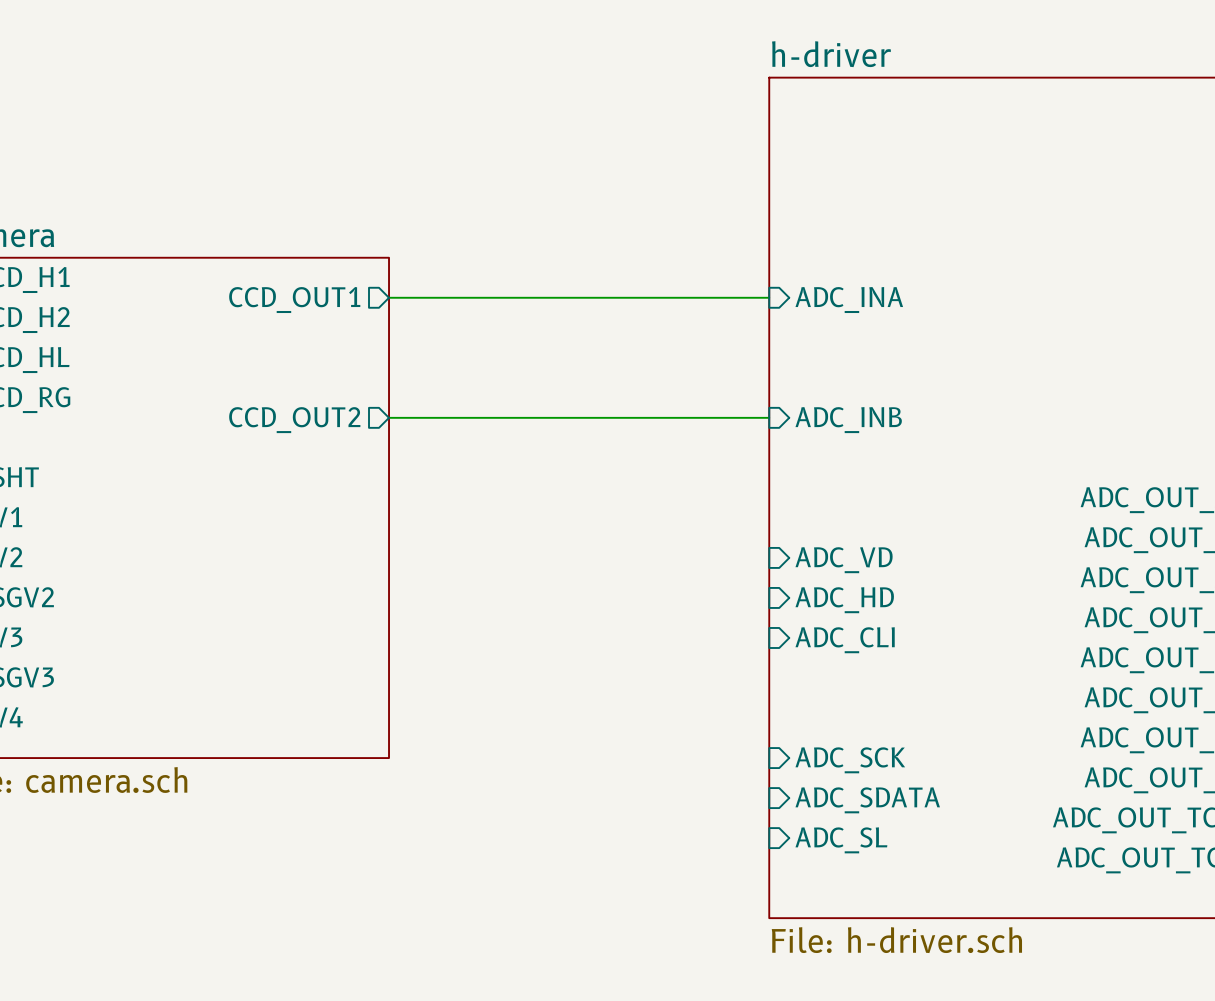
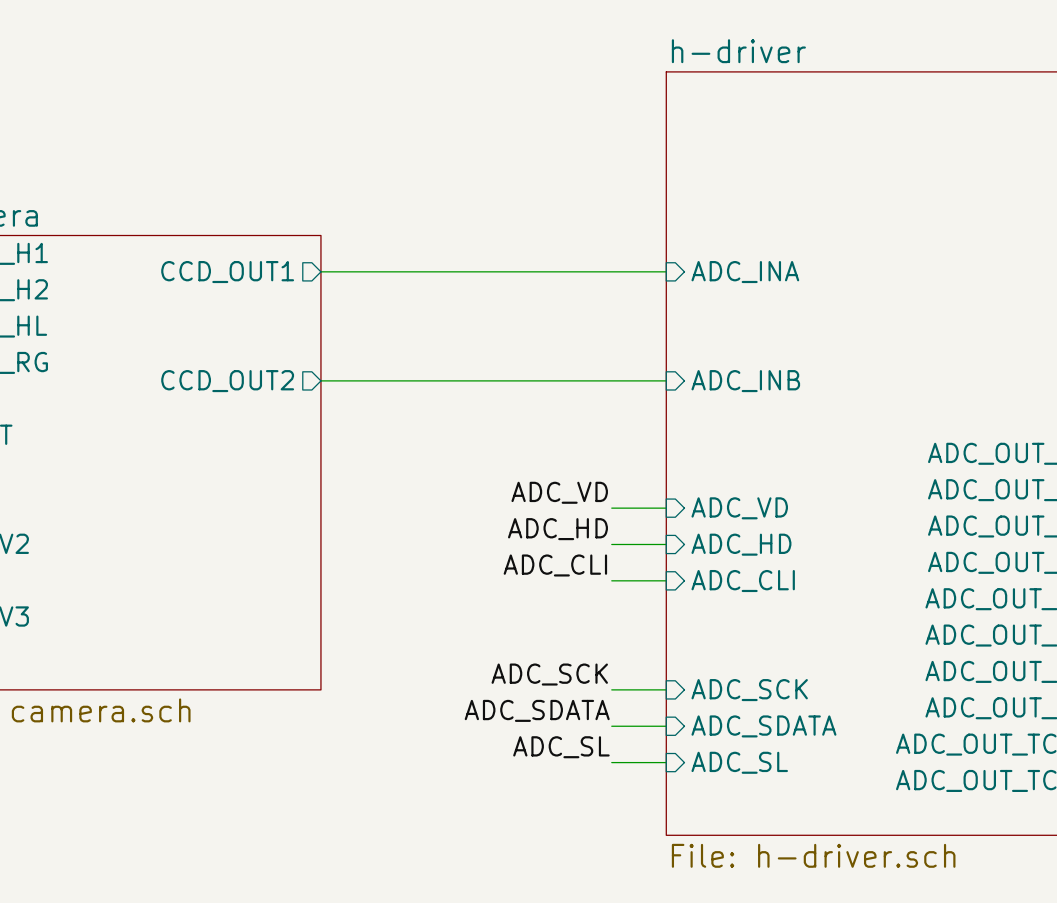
label: none -> ADC_VD (559, 492)
wire: none -> (611, 508) (666, 508)
label: none -> ADC_HD (557, 529)
wire: none -> (611, 544) (666, 544)
label: none -> ADC_CLI (555, 565)
wire: none -> (611, 580) (666, 580)
label: none -> ADC_SCK (549, 674)
wire: none -> (611, 689) (666, 689)
label: none -> ADC_SDATA (537, 710)
wire: none -> (611, 726) (666, 726)
label: none -> ADC_SL (561, 747)
wire: none -> (611, 762) (666, 762)

